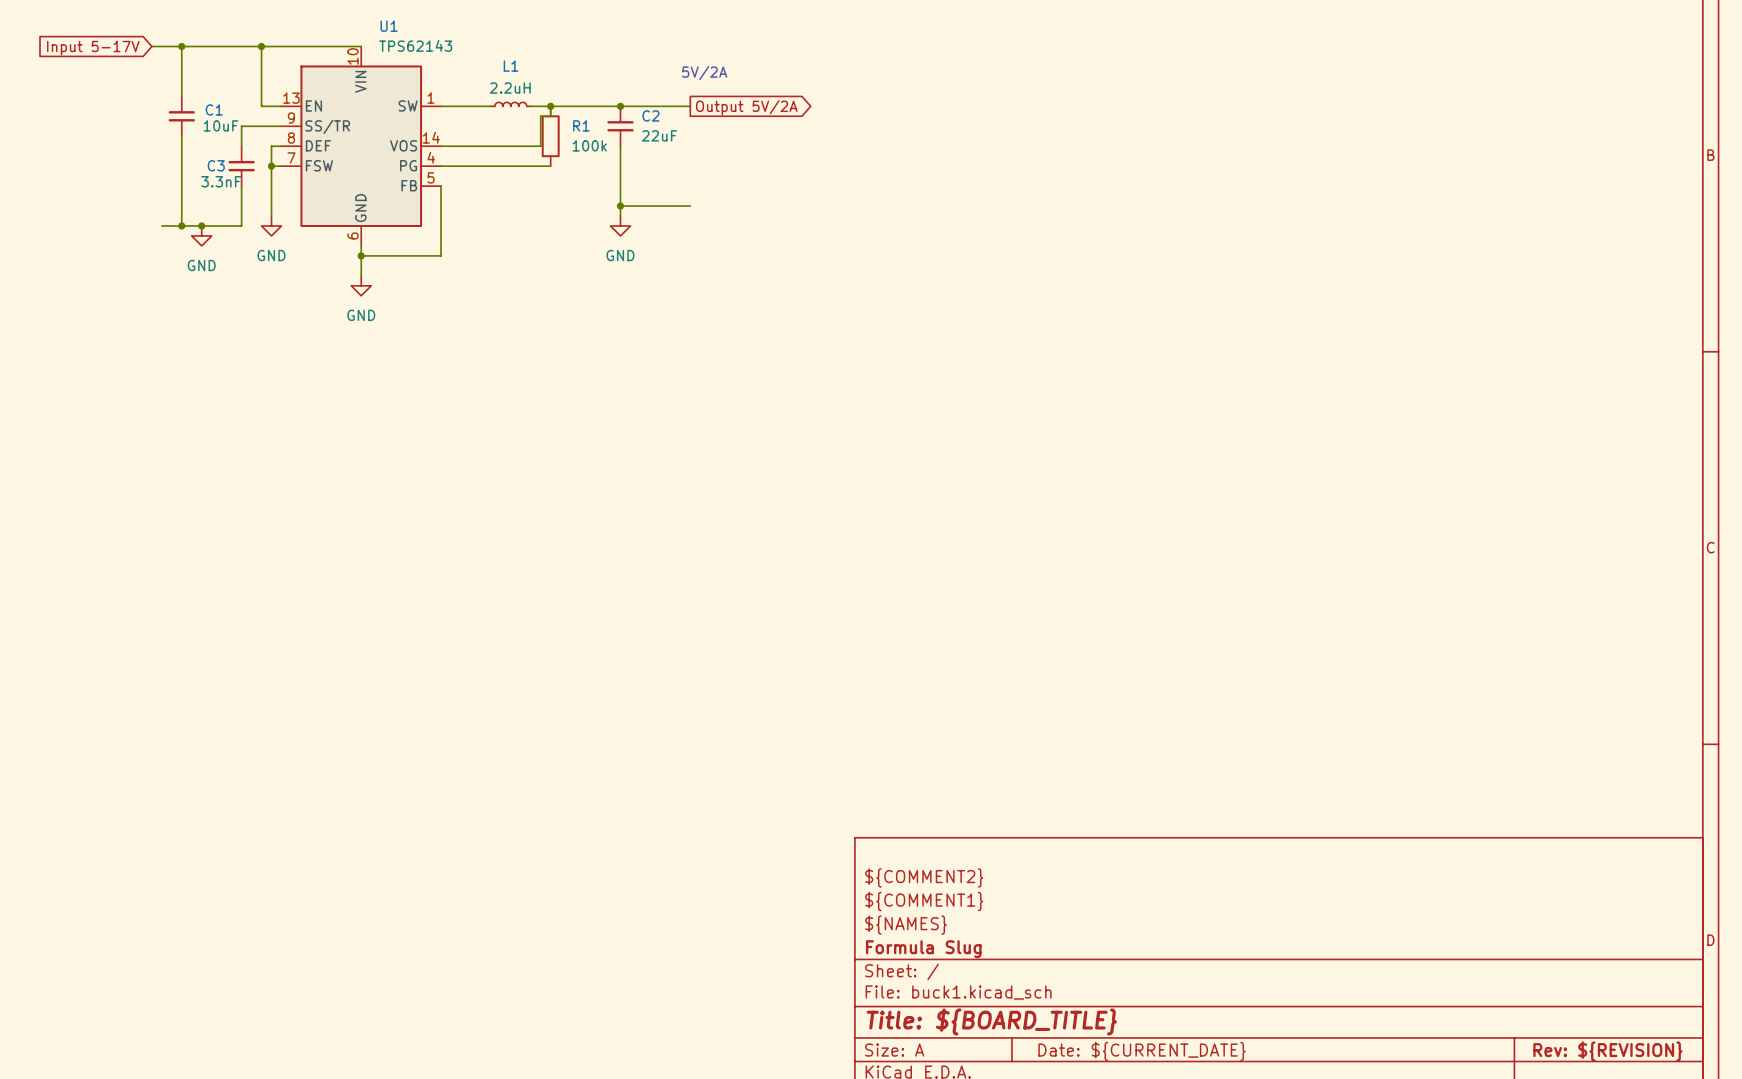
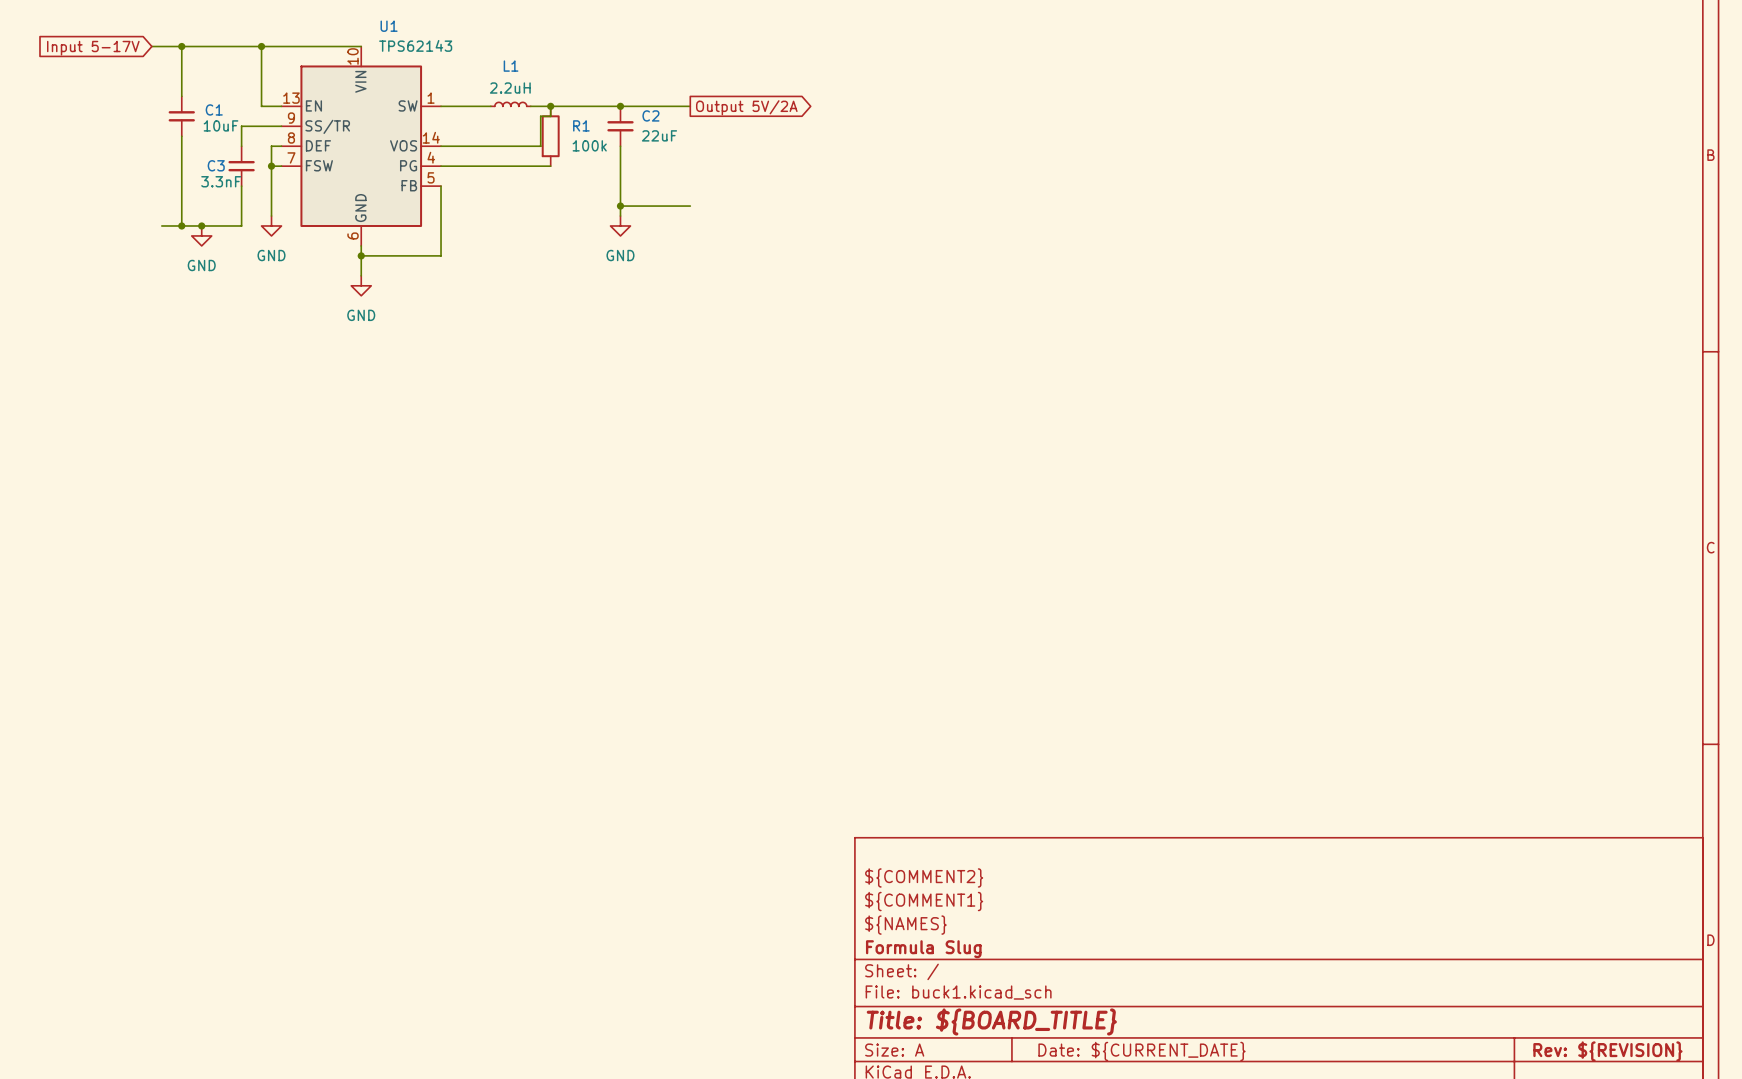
text: 5V/2A (704, 73) -> none

